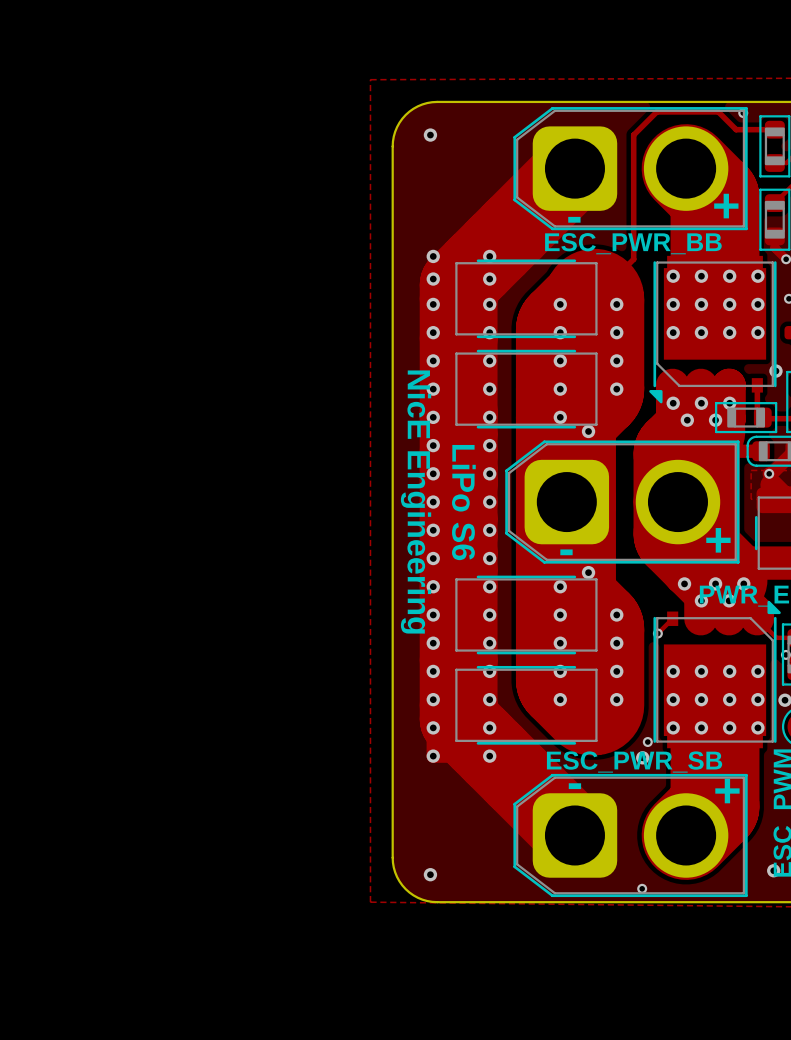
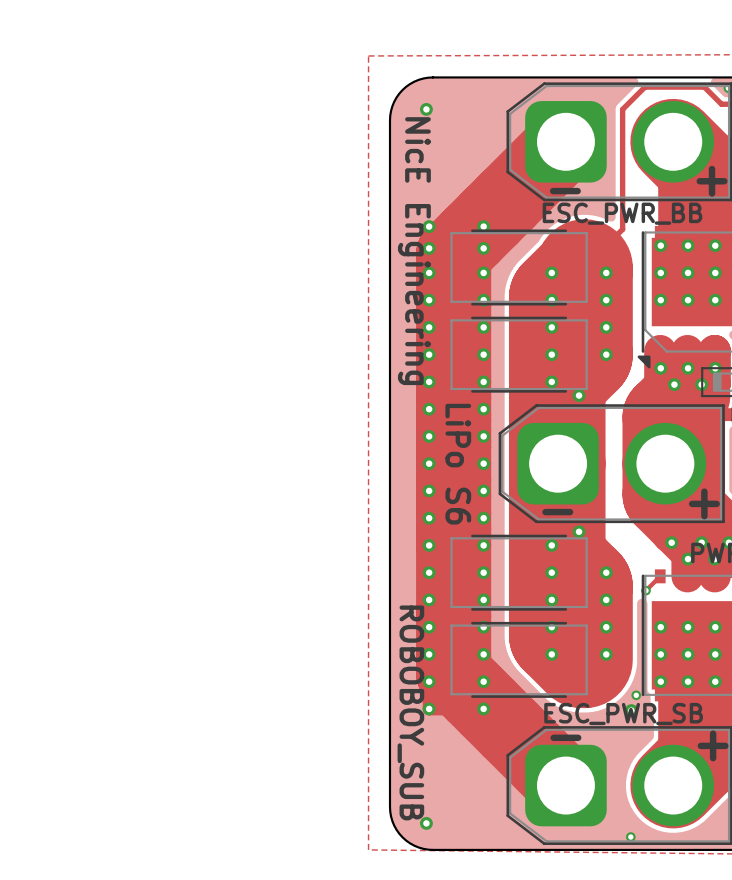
text position: NicE Engineering (416, 502) -> NicE Engineering (414, 251)
text: none -> ROBOBOY_SUB (410, 712)

